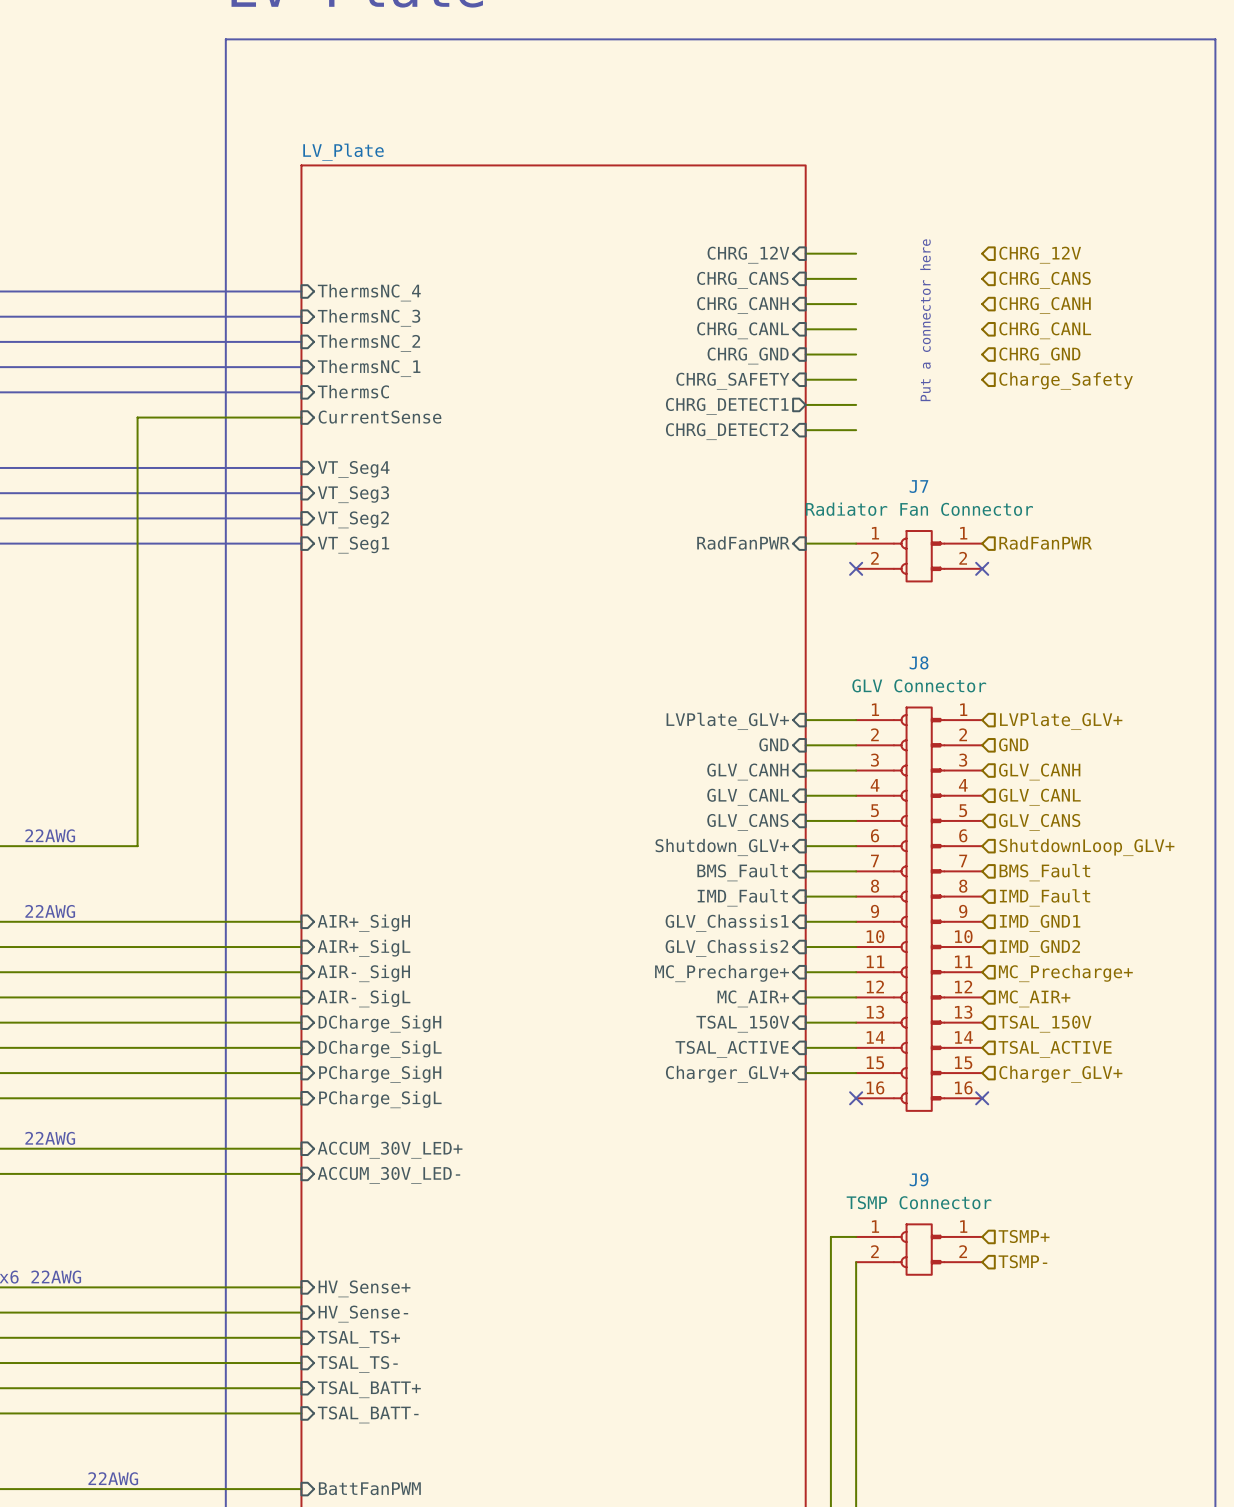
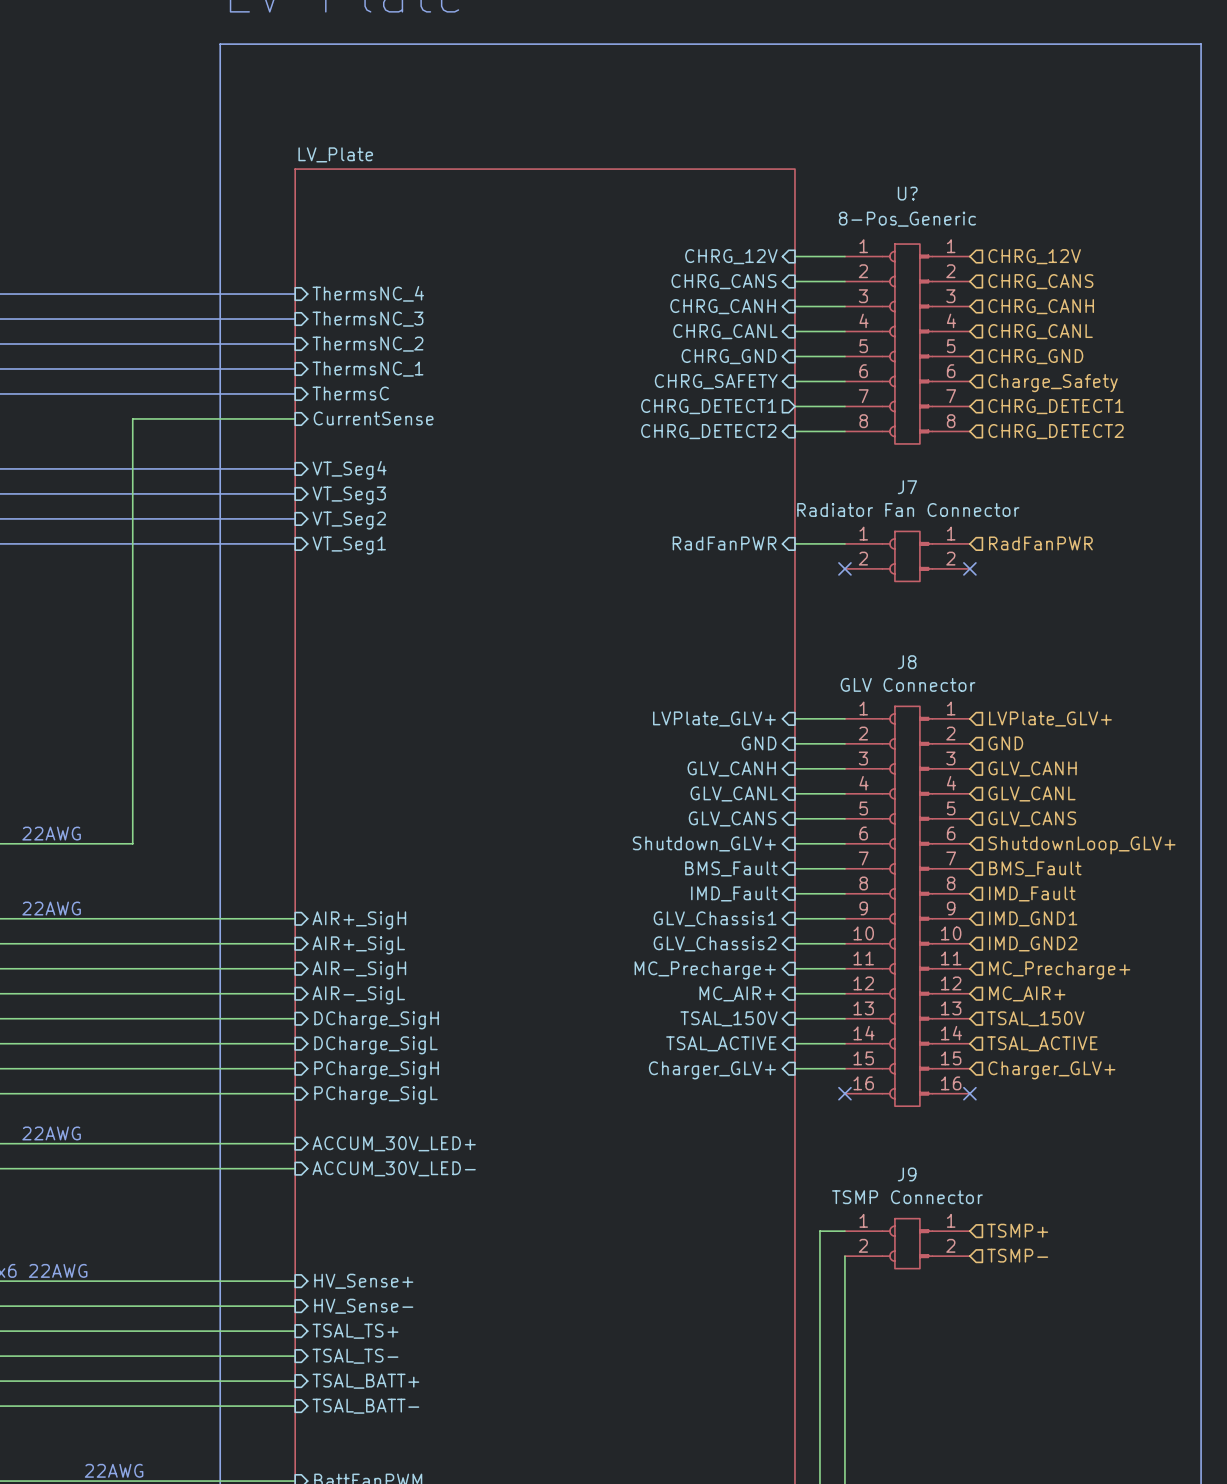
text: Put a connector here (925, 320) -> none
U?: none -> 8-Pos_Generic (907, 344)
hierarchical label: none -> CHRG_DETECT1 (1056, 406)
hierarchical label: none -> CHRG_DETECT2 (1056, 431)

